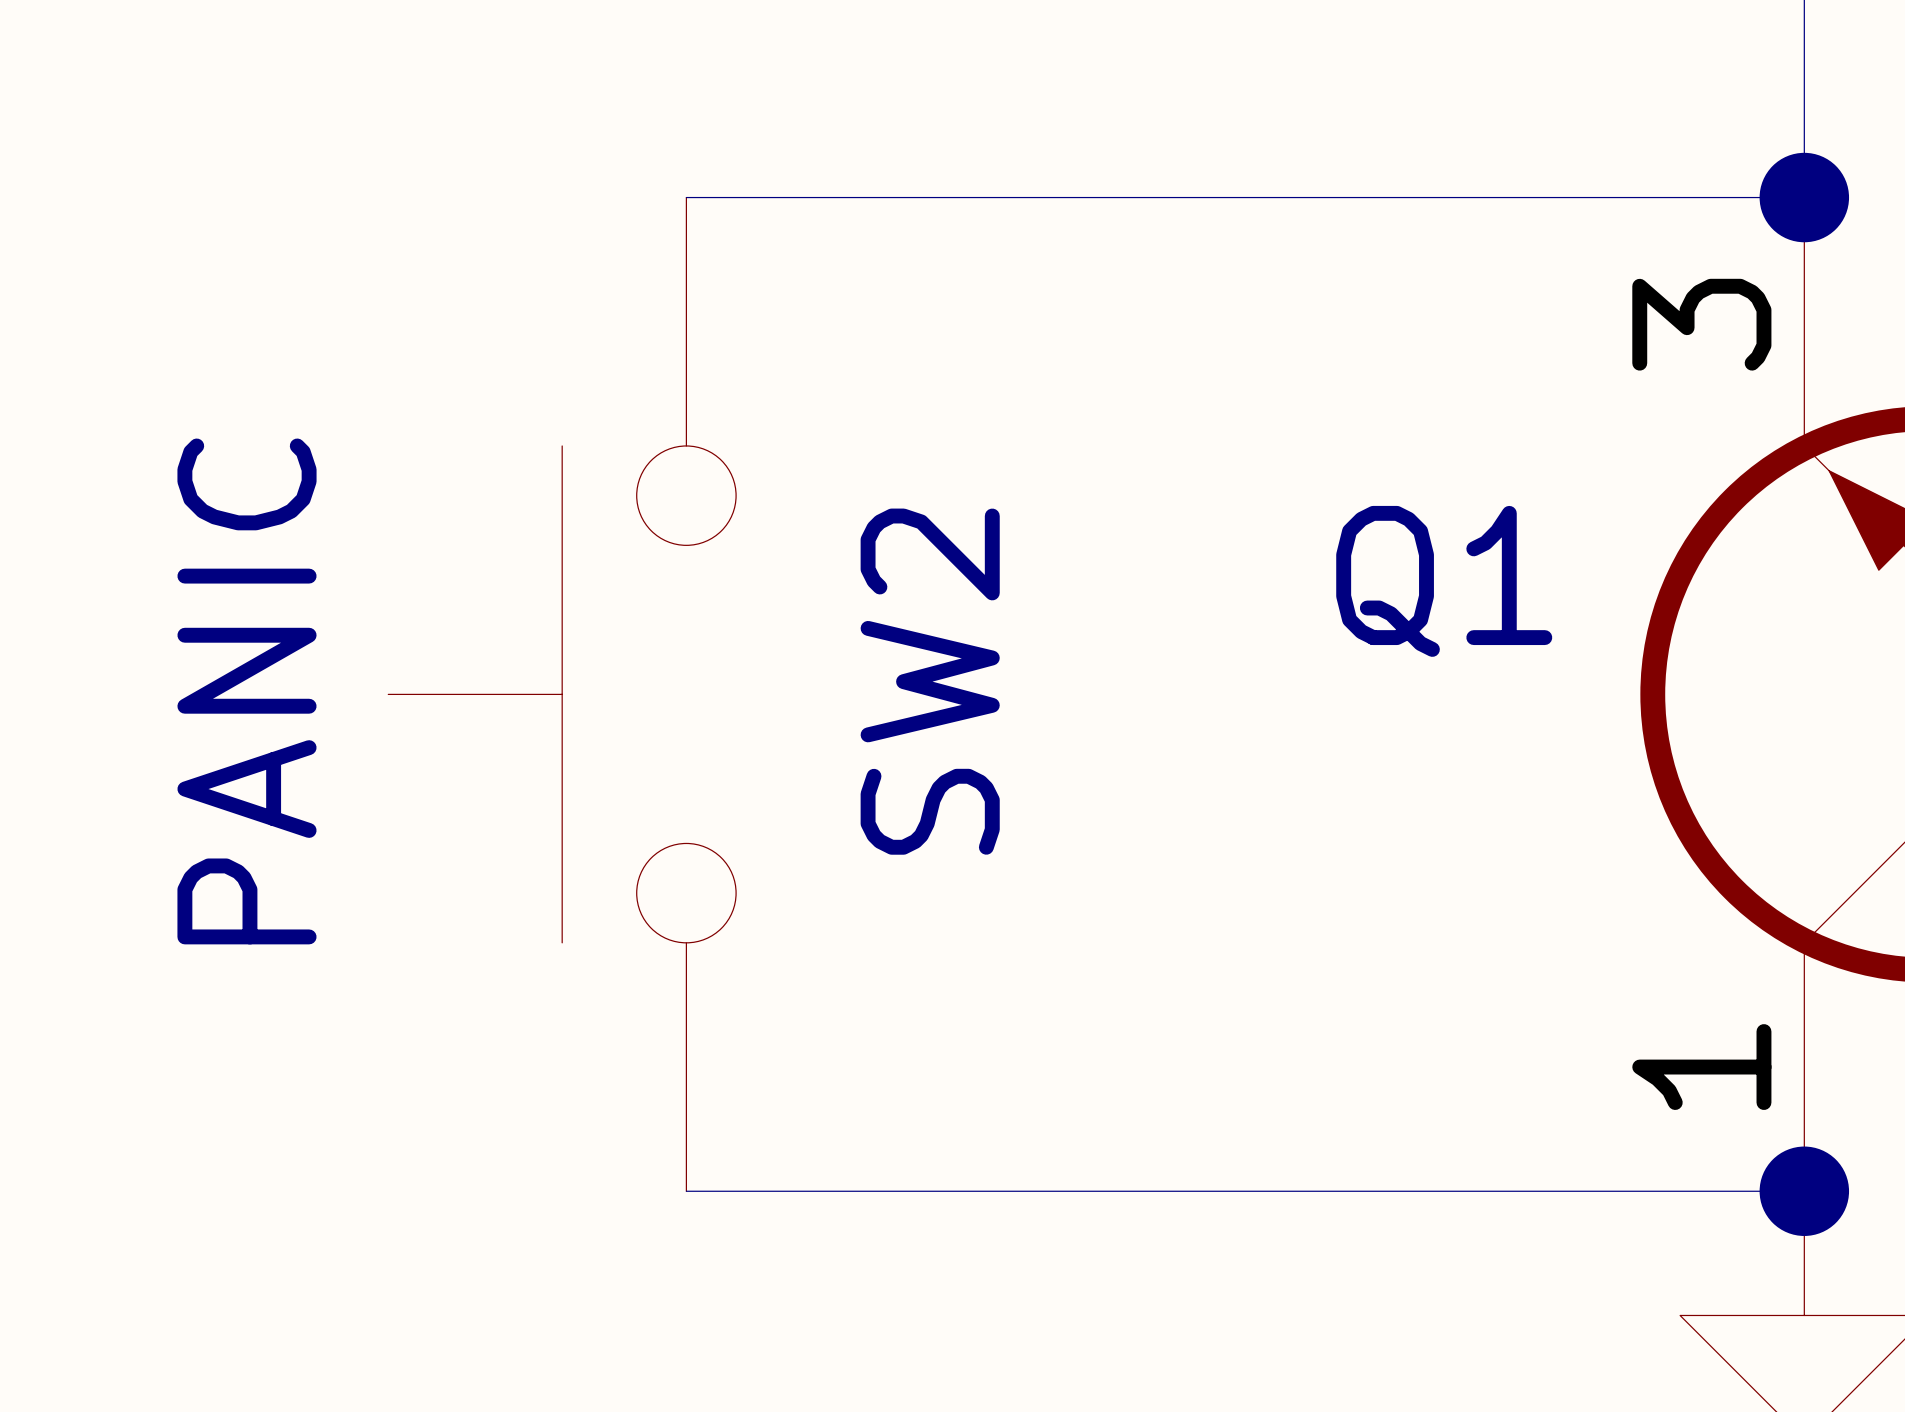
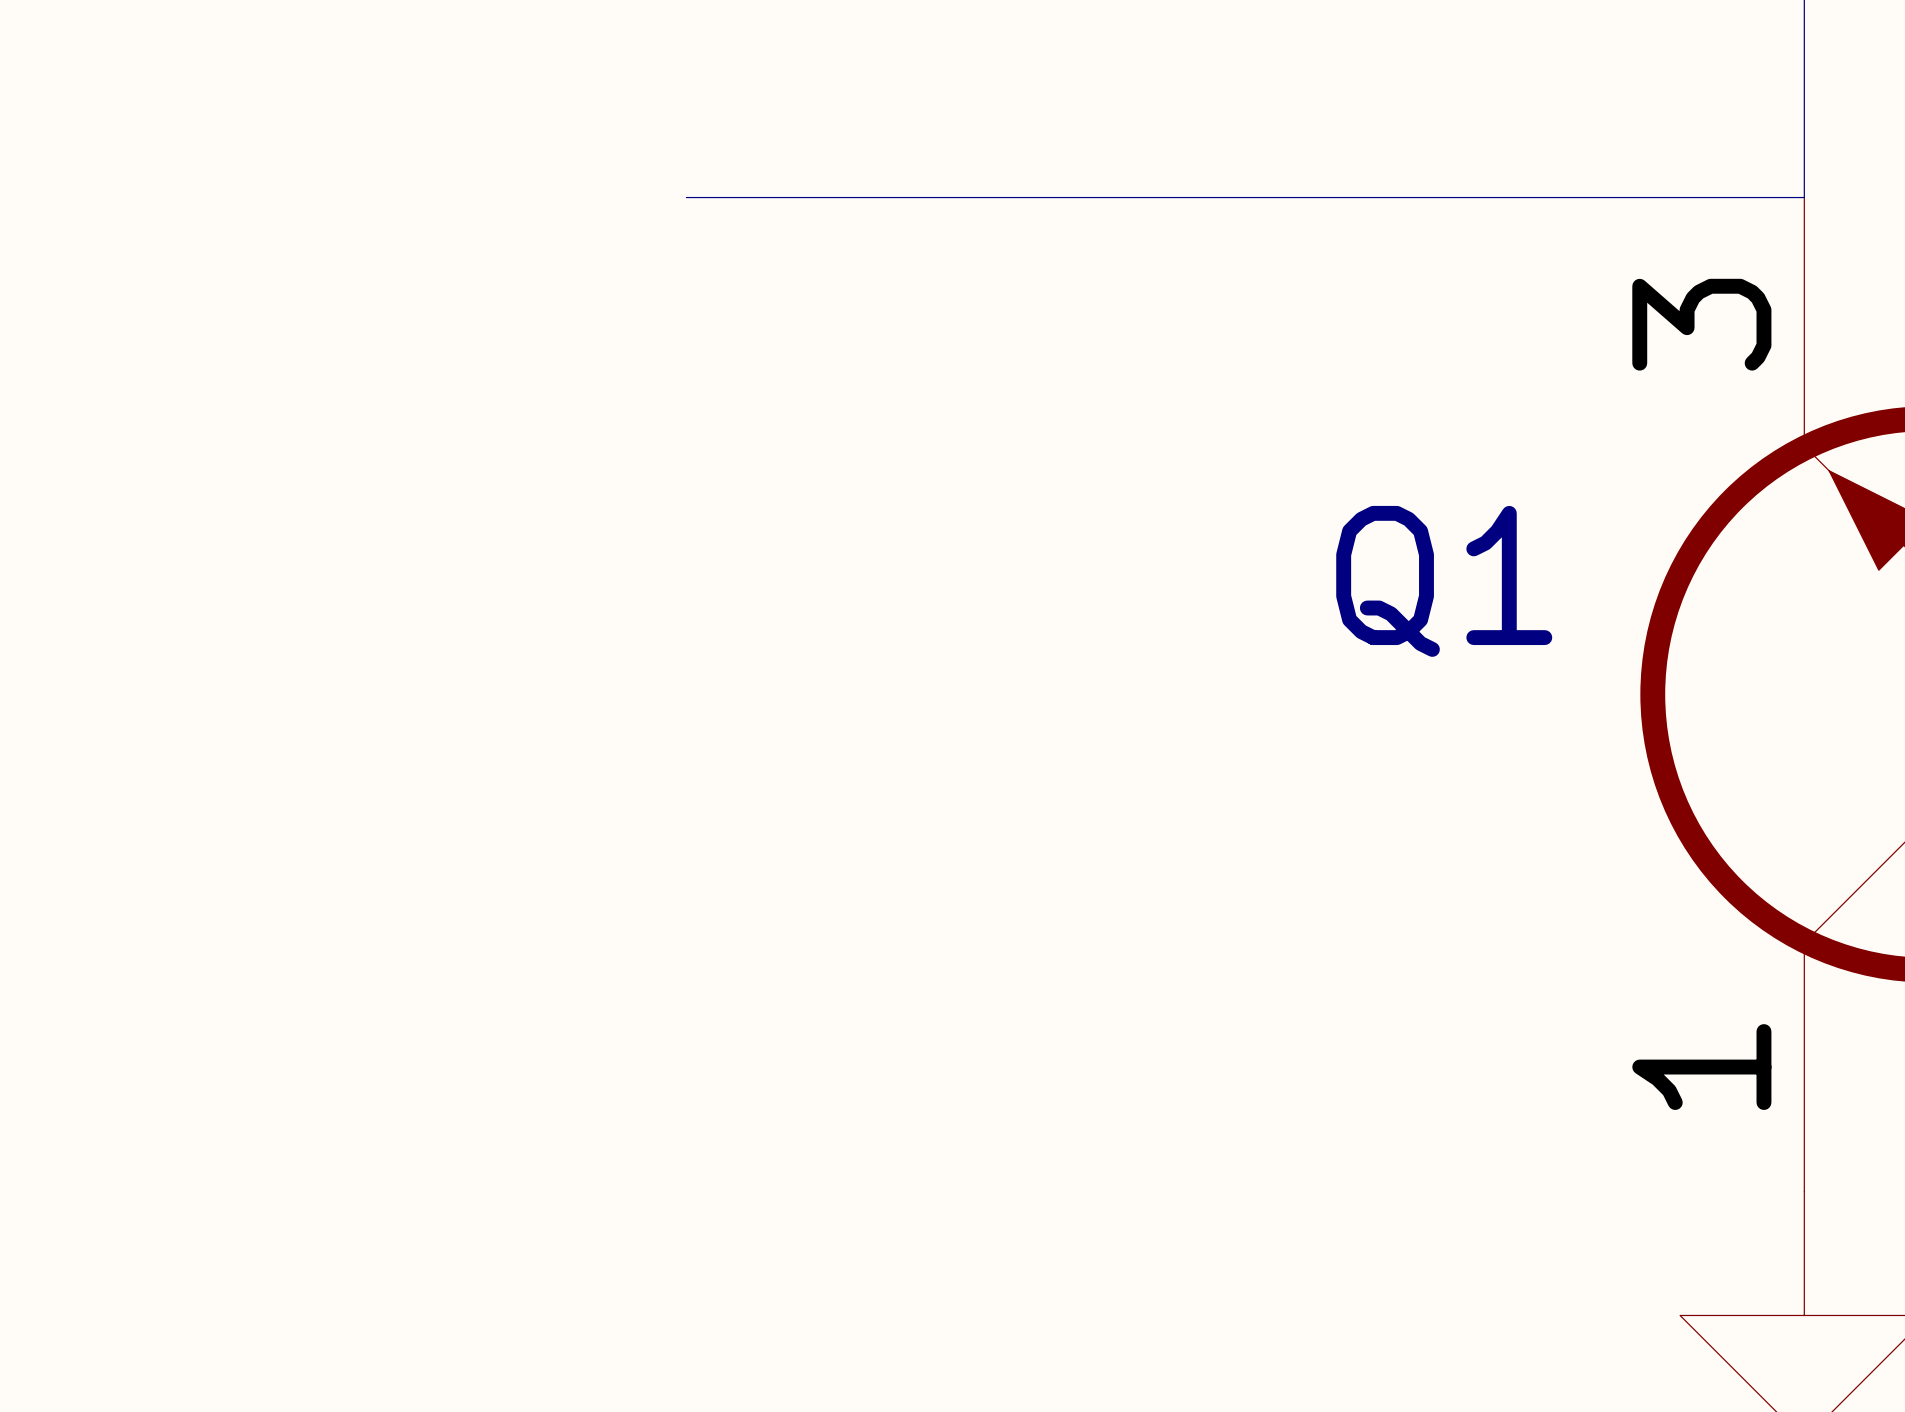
junction: (1804, 197) -> none
SW2: PANIC (562, 694) -> none
wire: (686, 1191) (1804, 1191) -> none
junction: (1804, 1191) -> none

